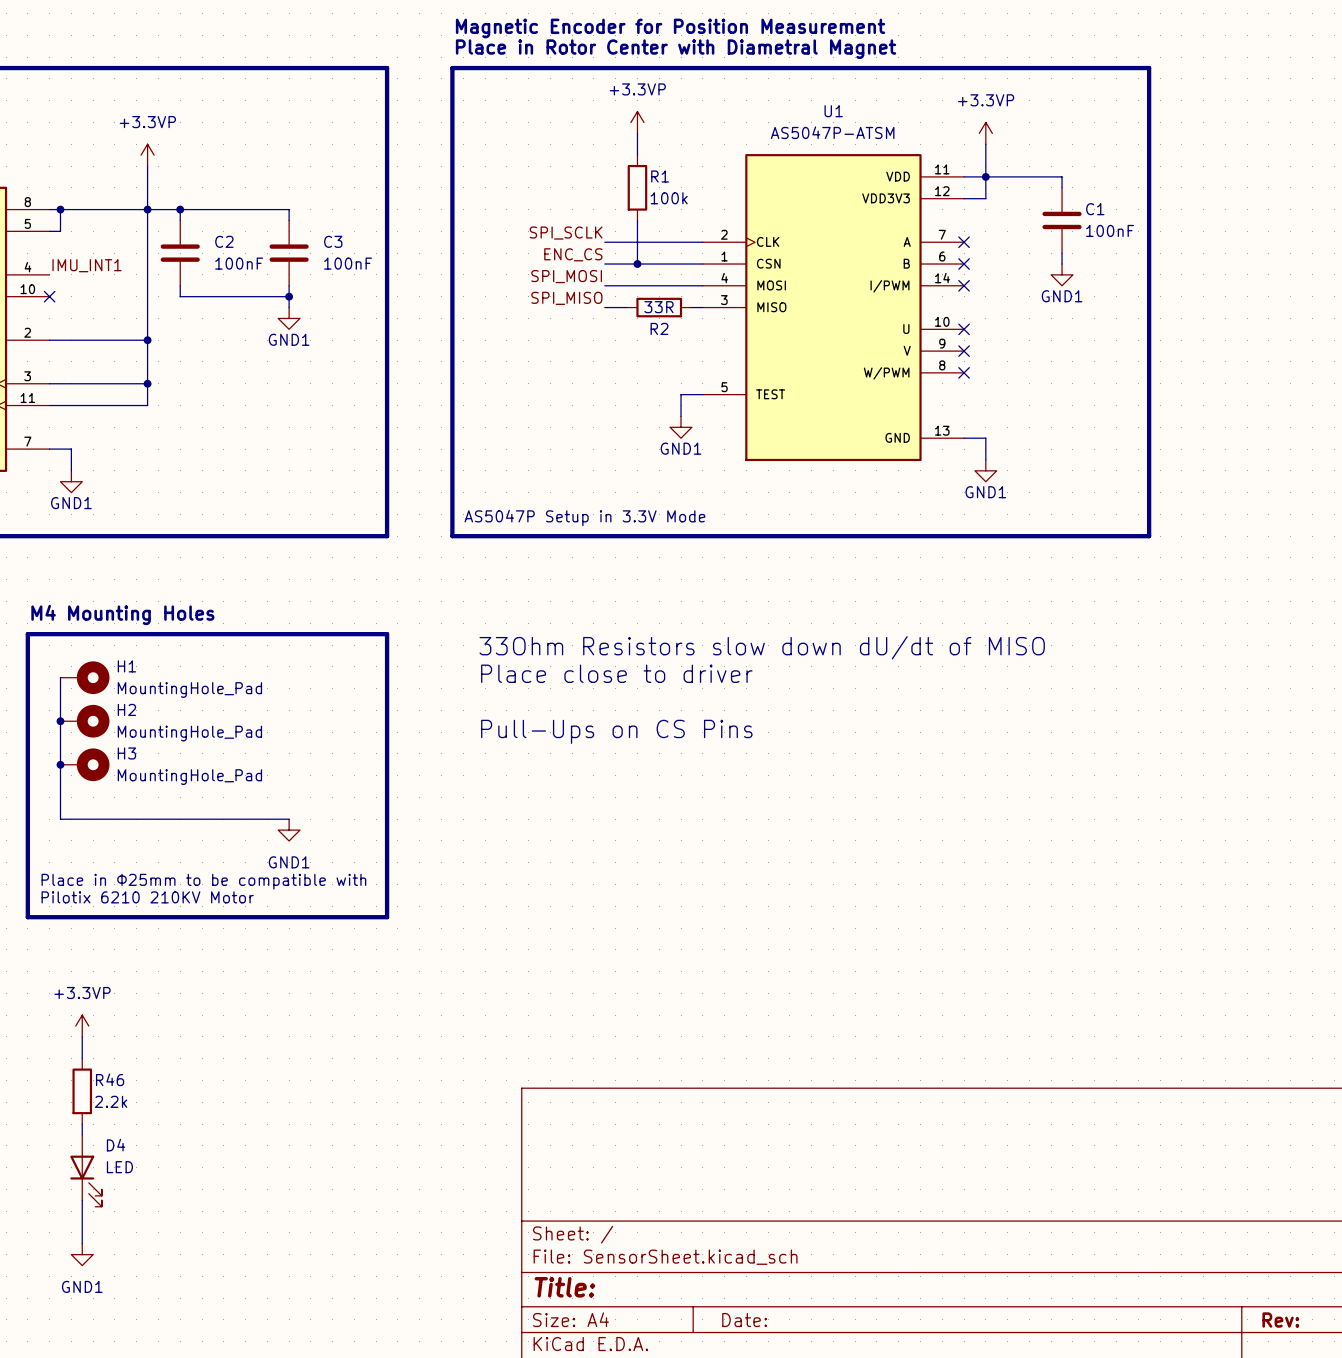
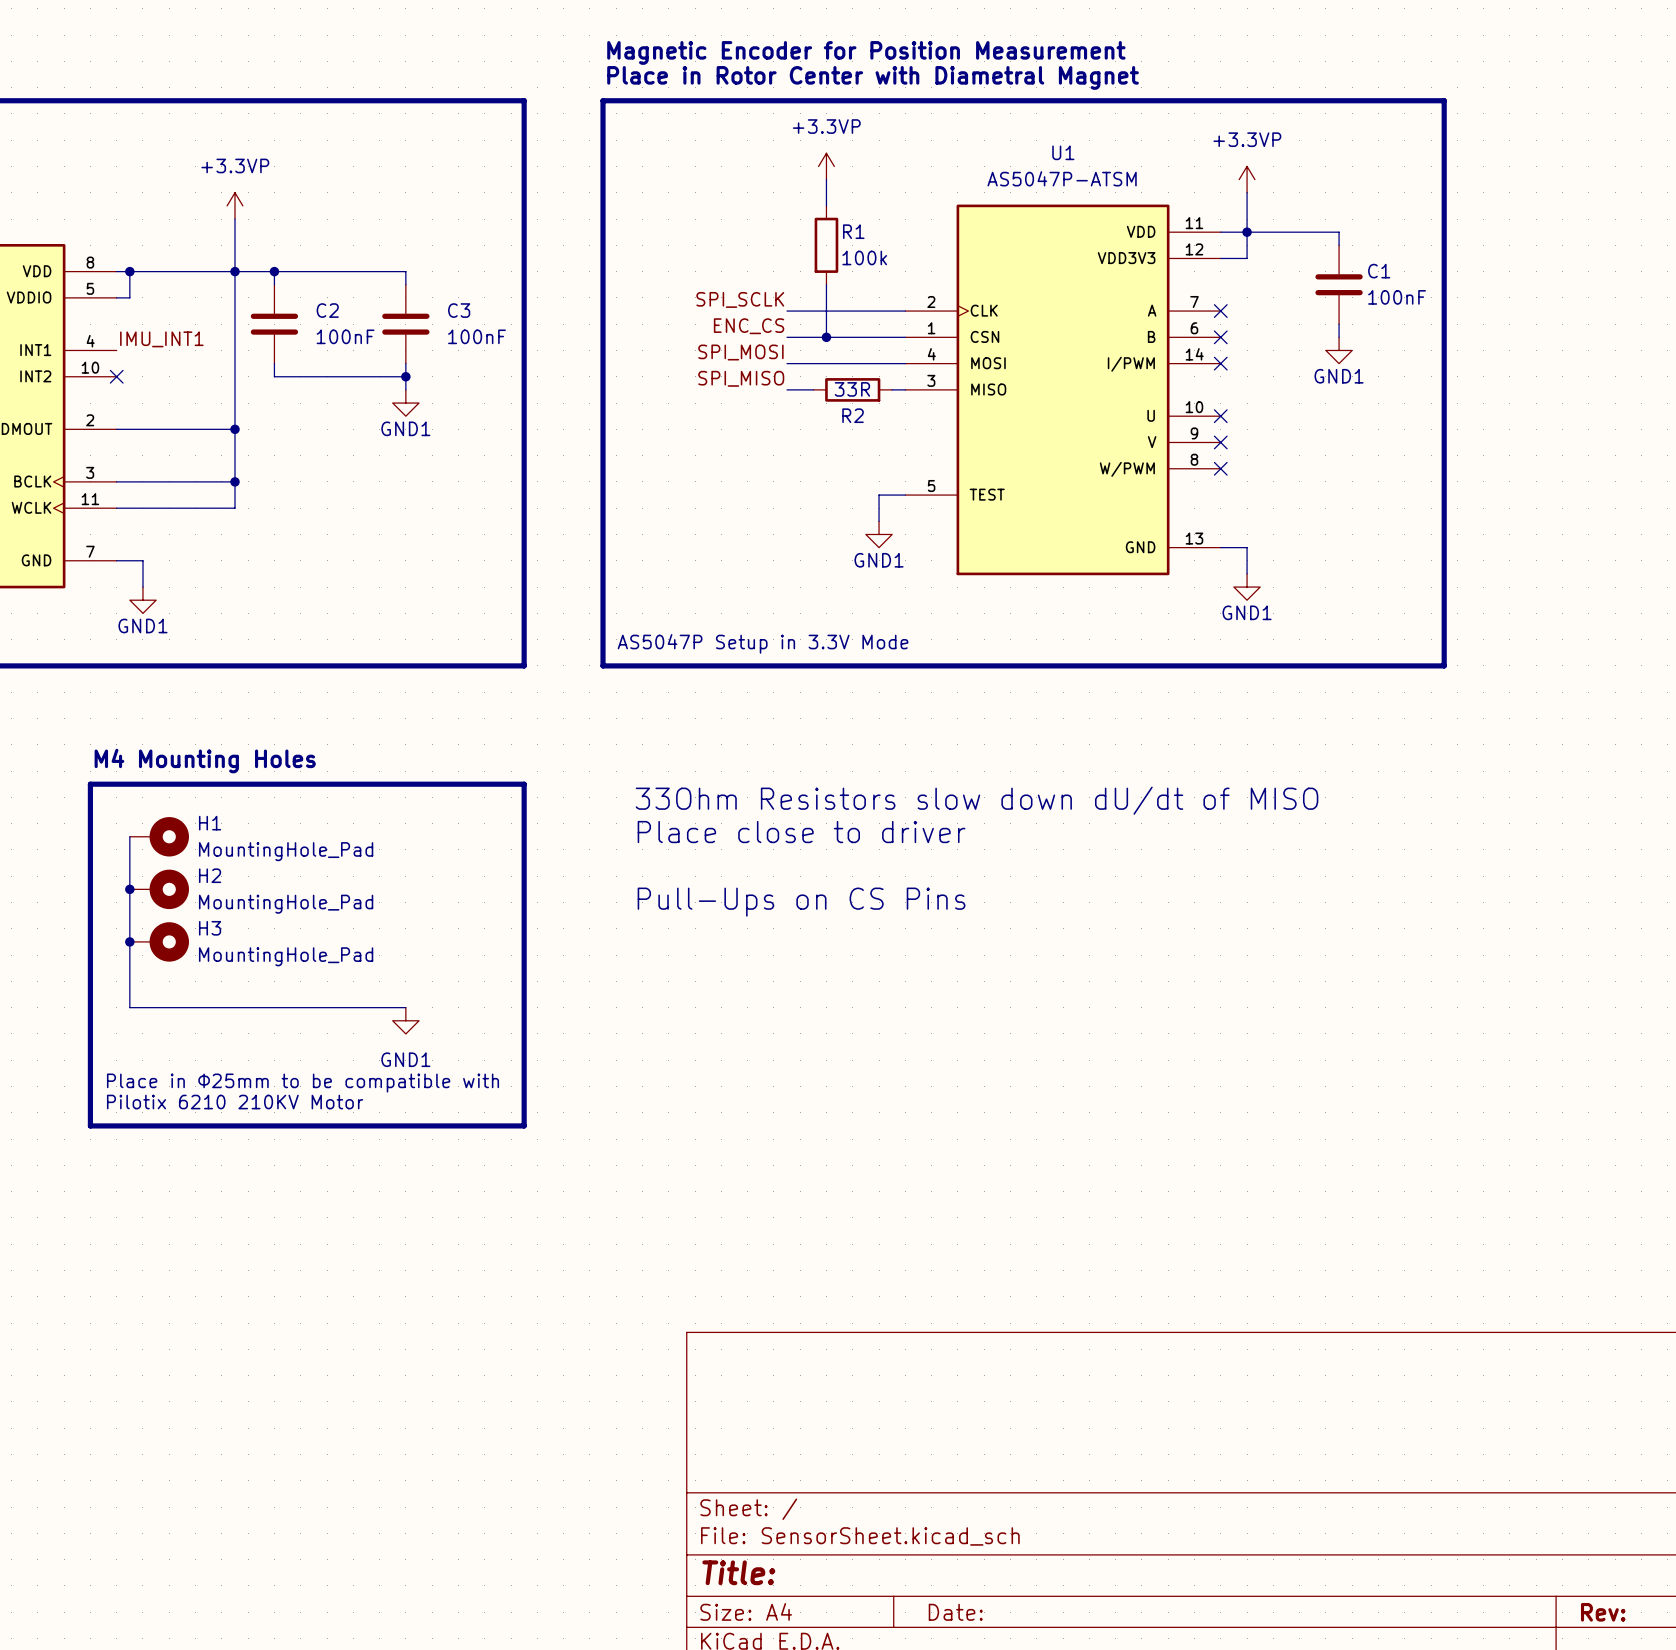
power symbol: +3.3VP (82, 1026) -> none
wire: (82, 1036) (82, 1058) -> none
R46: 2.2k (82, 1091) -> none
wire: (82, 1124) (82, 1134) -> none
D4: LED (86, 1170) -> none
wire: (82, 1200) (82, 1243) -> none
power symbol: GND1 (82, 1254) -> none

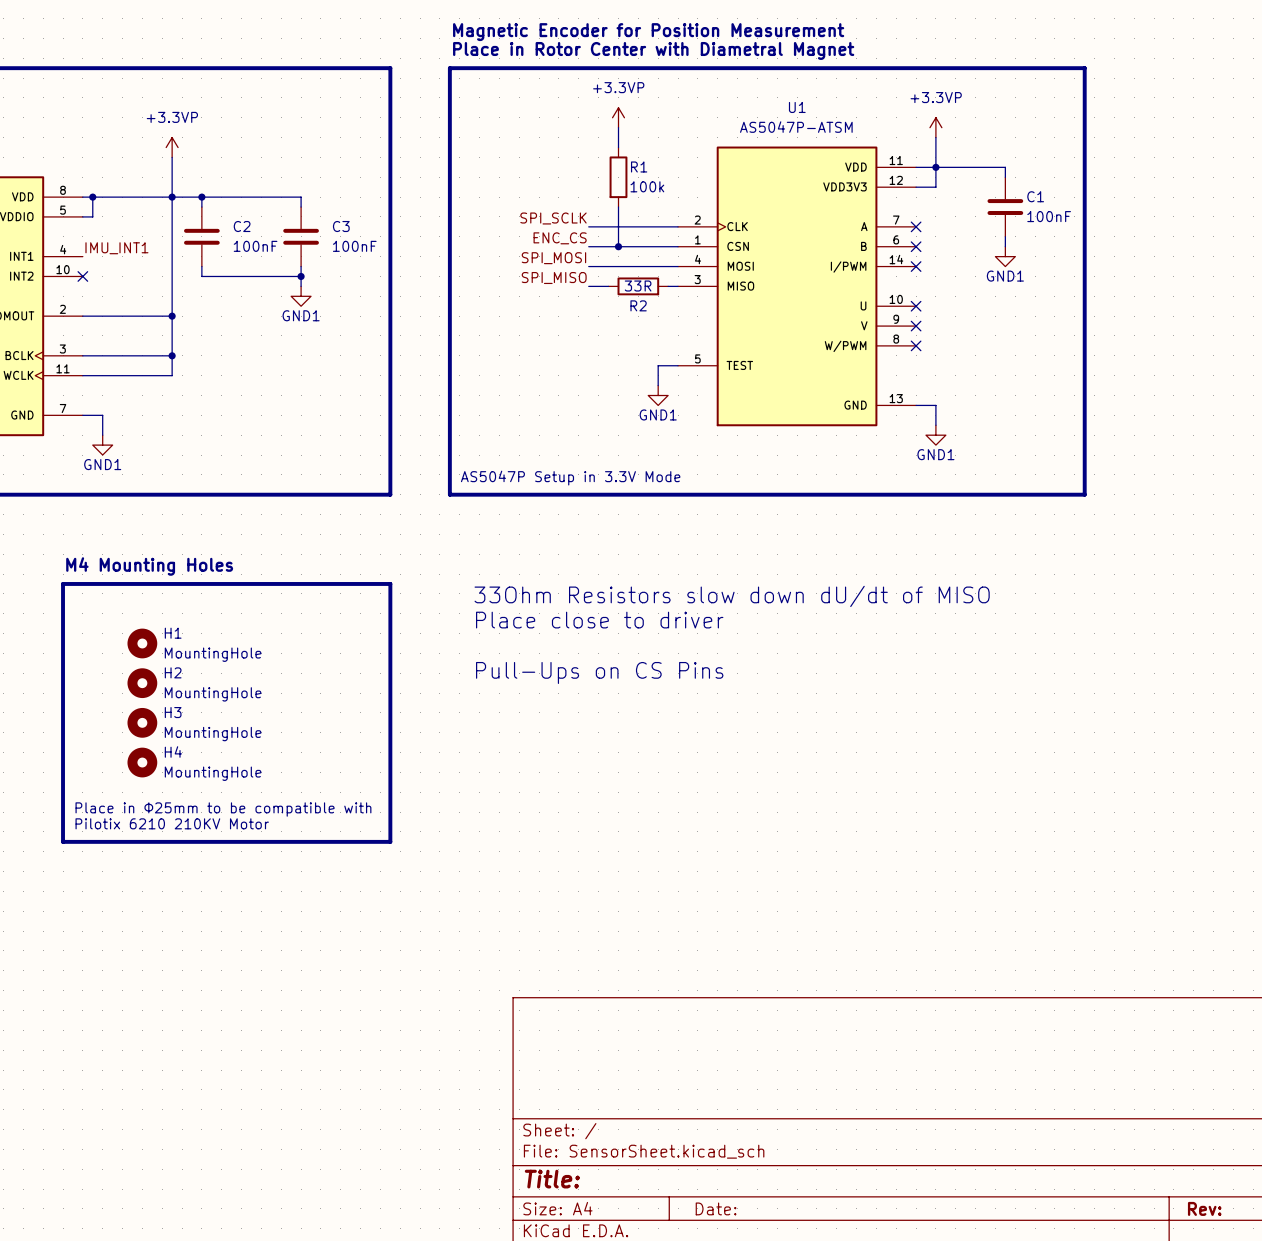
H1 symbol: [129, 817, 189, 857] -> [127, 628, 158, 659]
wire: (129, 836) (129, 1007) (405, 1007) -> none
H1 value: MountingHole_Pad (286, 851) -> MountingHole (213, 654)
H2 symbol: [129, 869, 189, 910] -> [127, 668, 158, 699]
junction: (129, 889) -> none
H2 value: MountingHole_Pad (286, 904) -> MountingHole (213, 694)
H3 symbol: [129, 922, 189, 962] -> [127, 707, 158, 738]
junction: (129, 941) -> none
H3 value: MountingHole_Pad (286, 956) -> MountingHole (213, 734)
H4: none -> MountingHole (142, 762)
power symbol: GND1 (405, 1020) -> none

